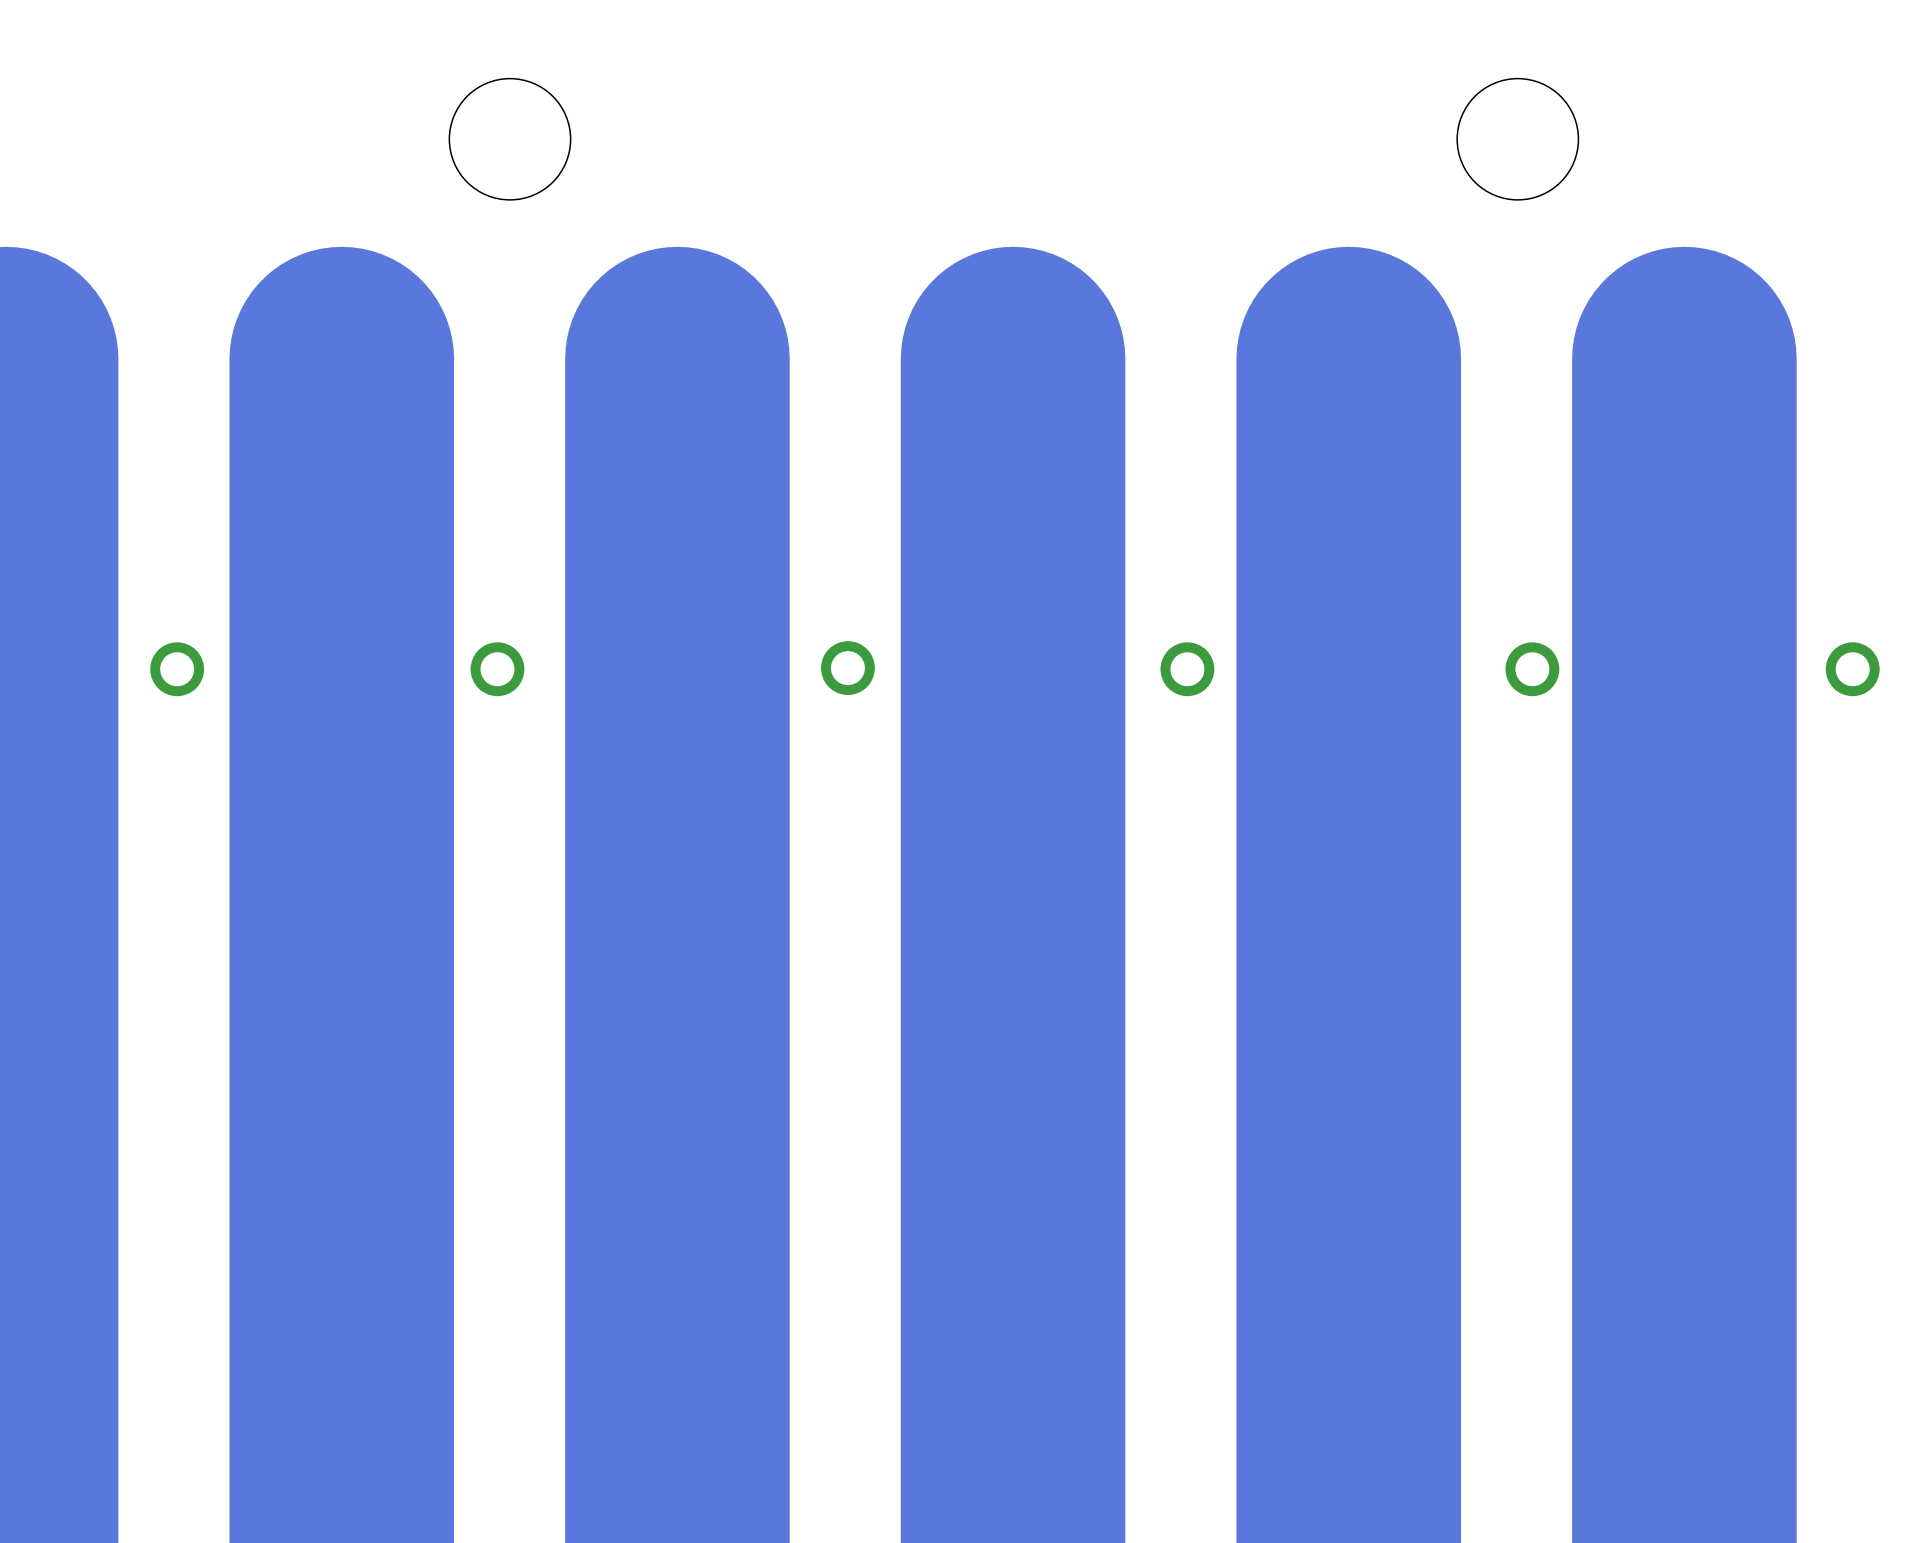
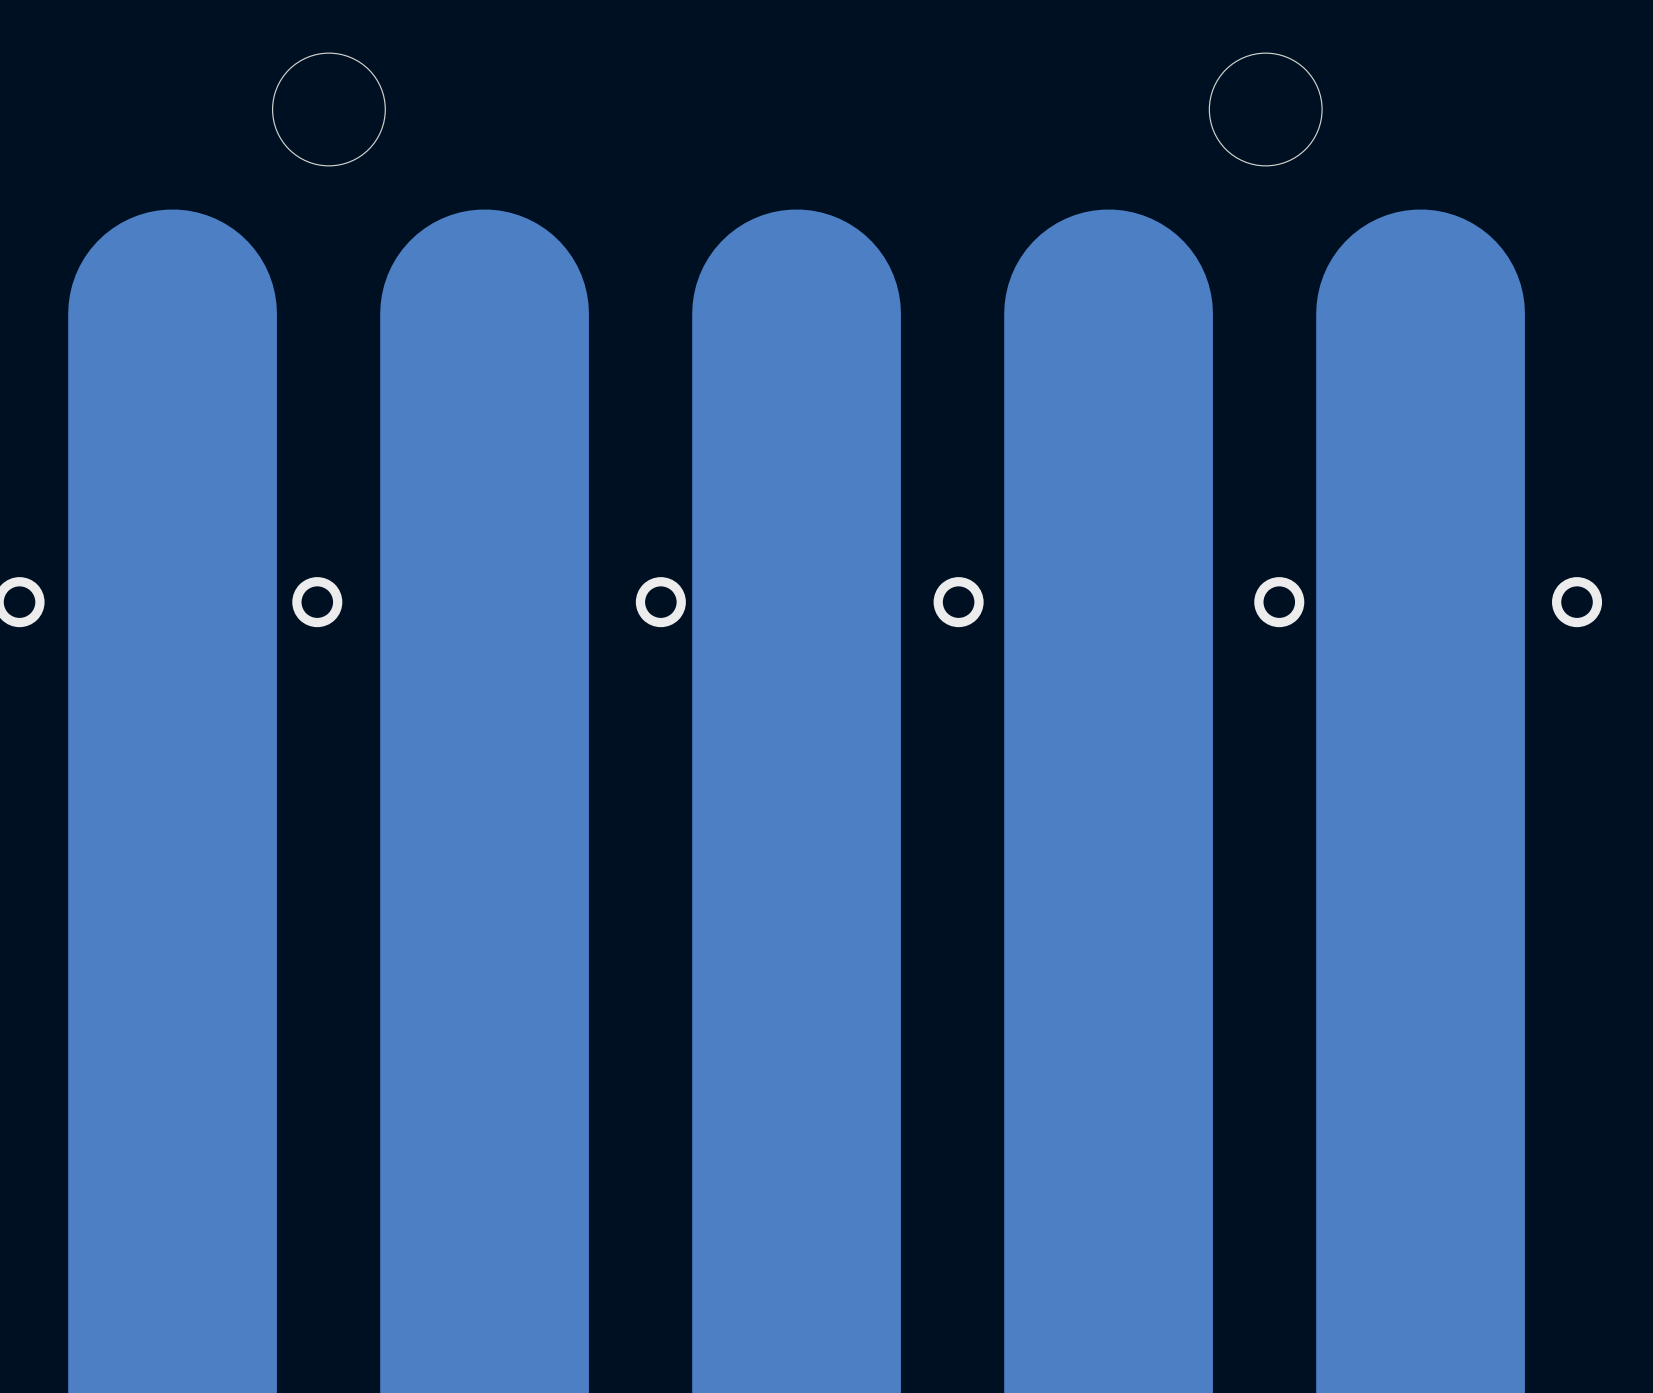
via position: (847, 668) -> (660, 602)

